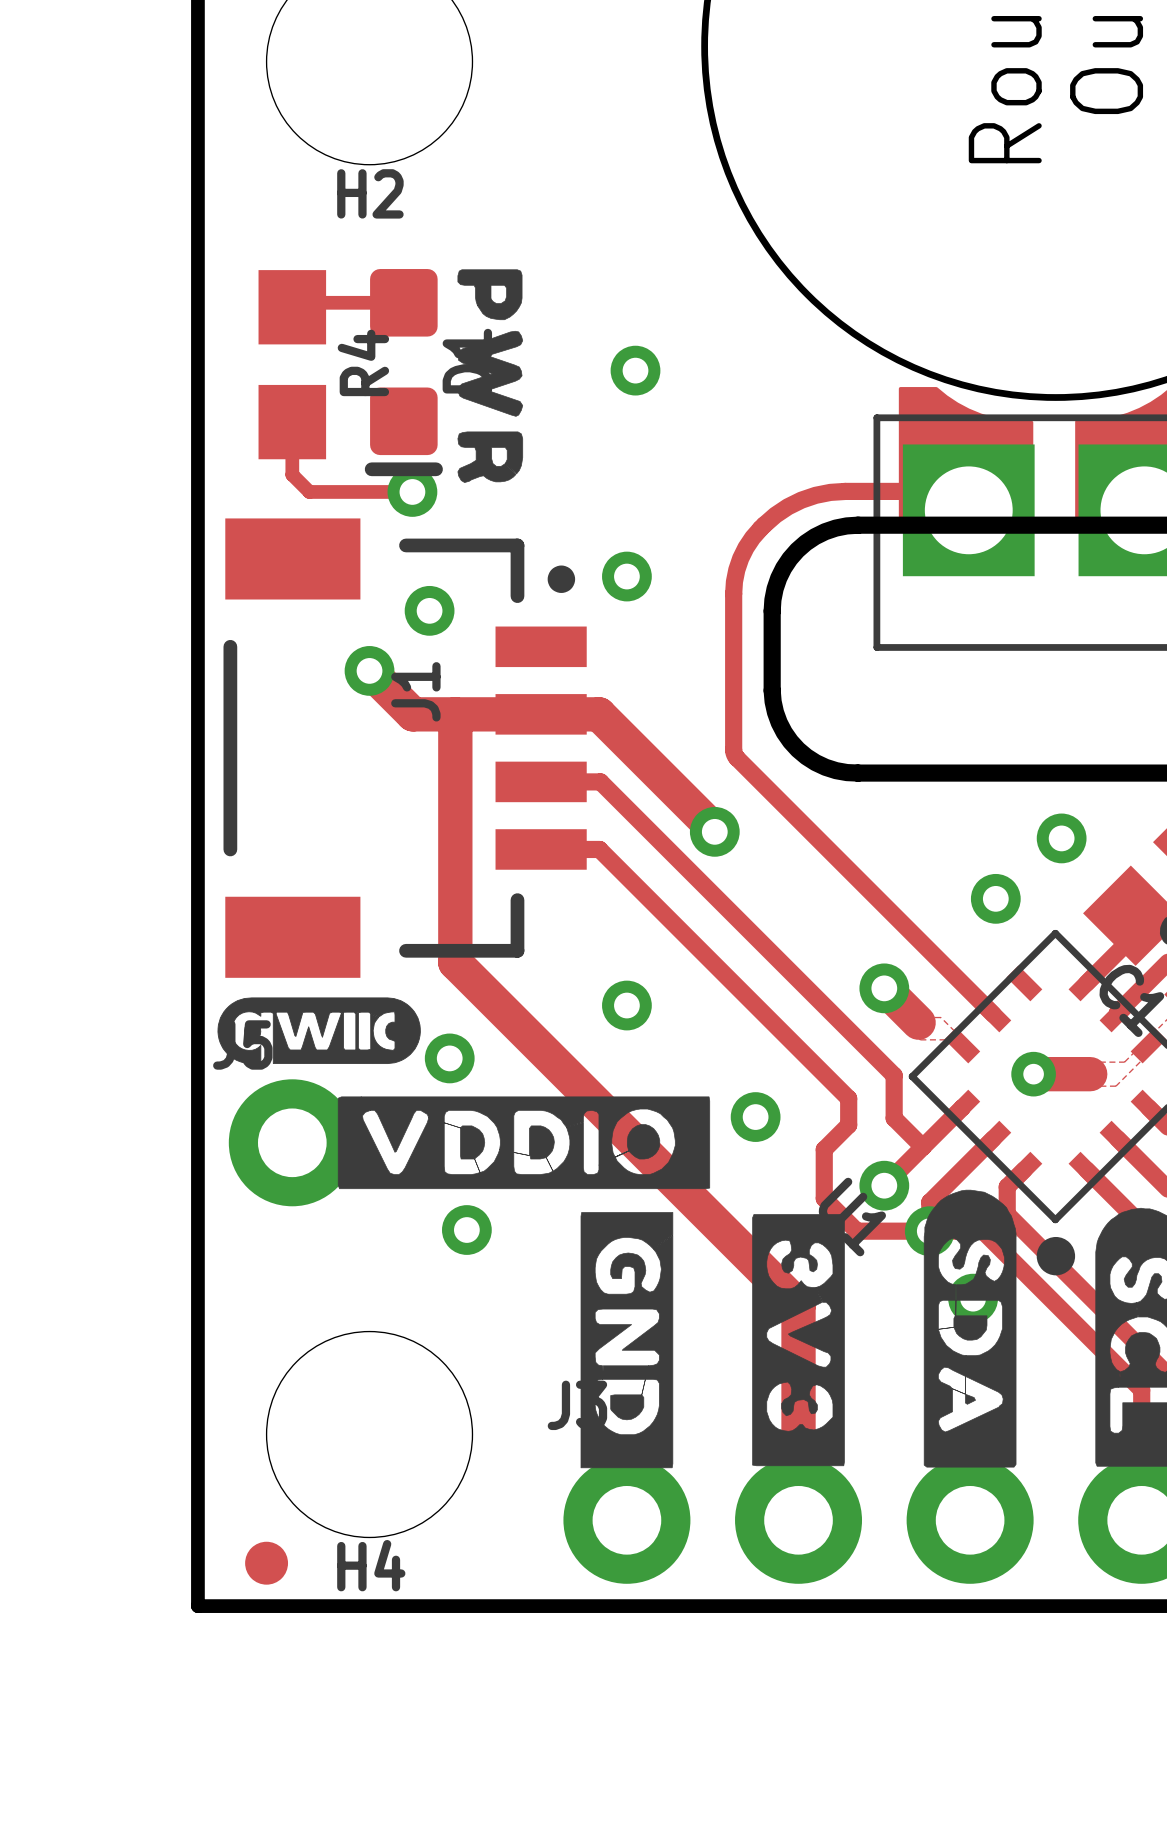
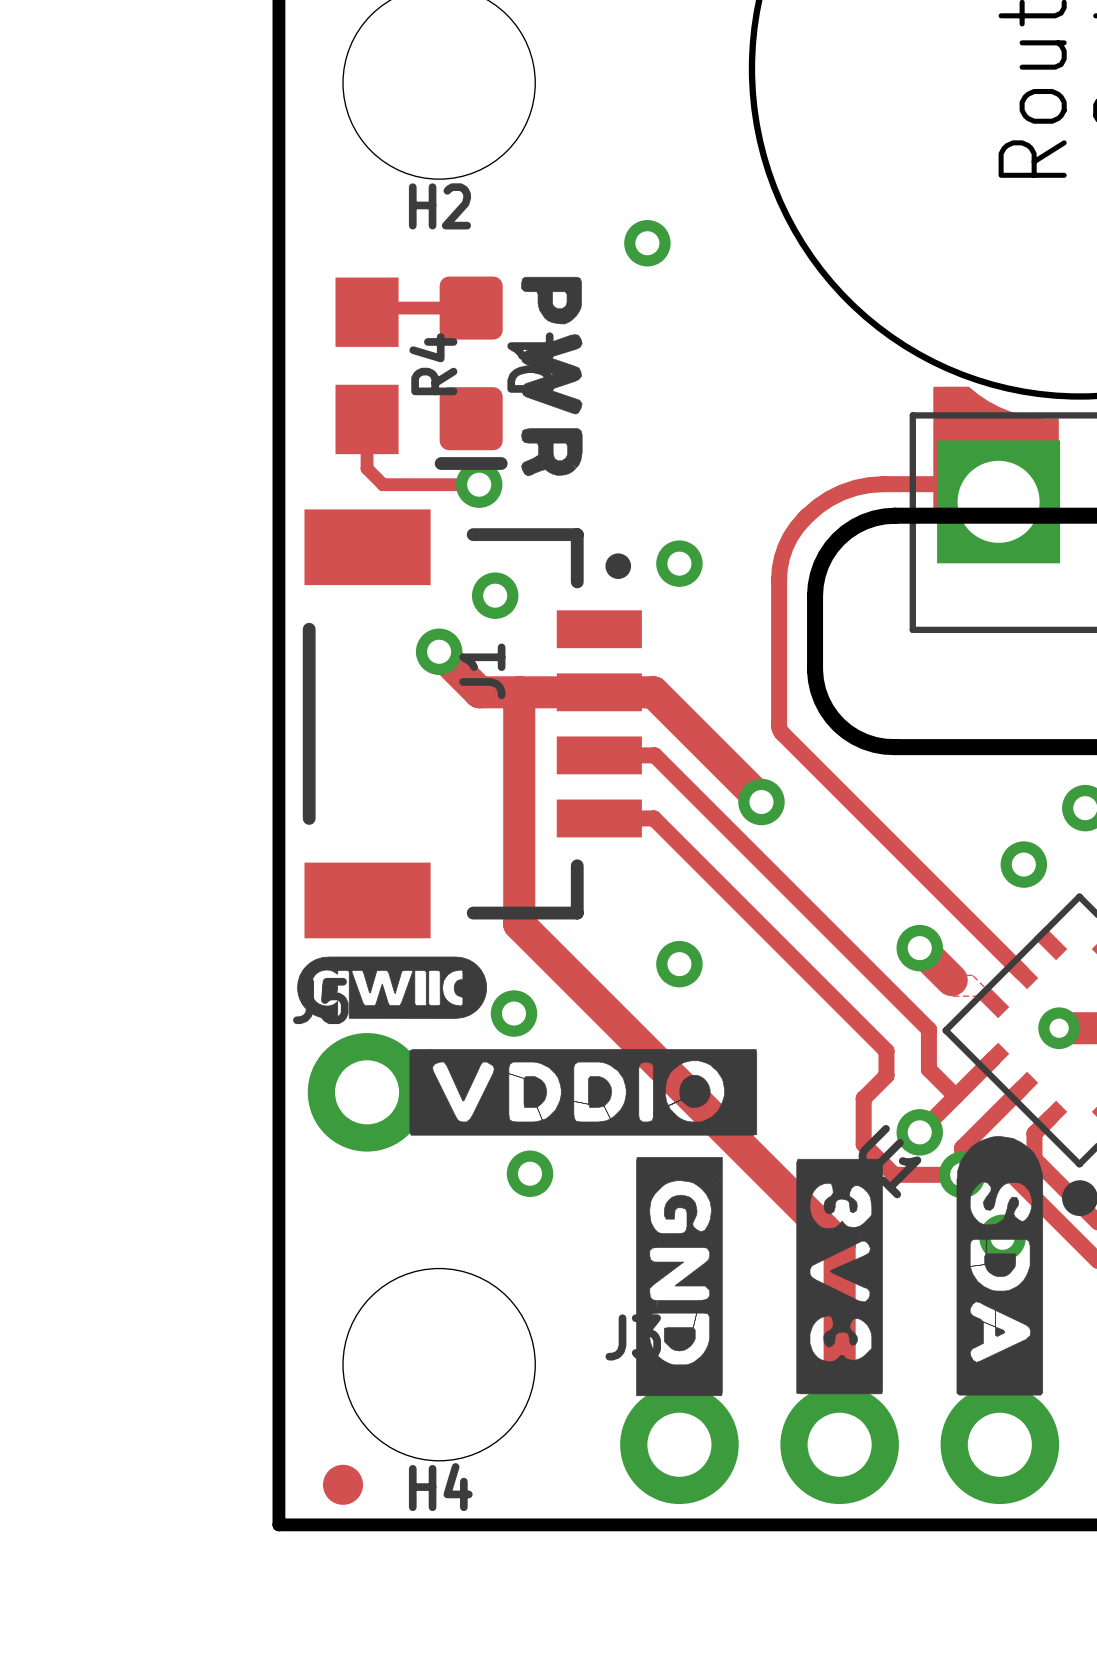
via position: (635, 370) -> (647, 243)
via: (755, 1117) -> none

